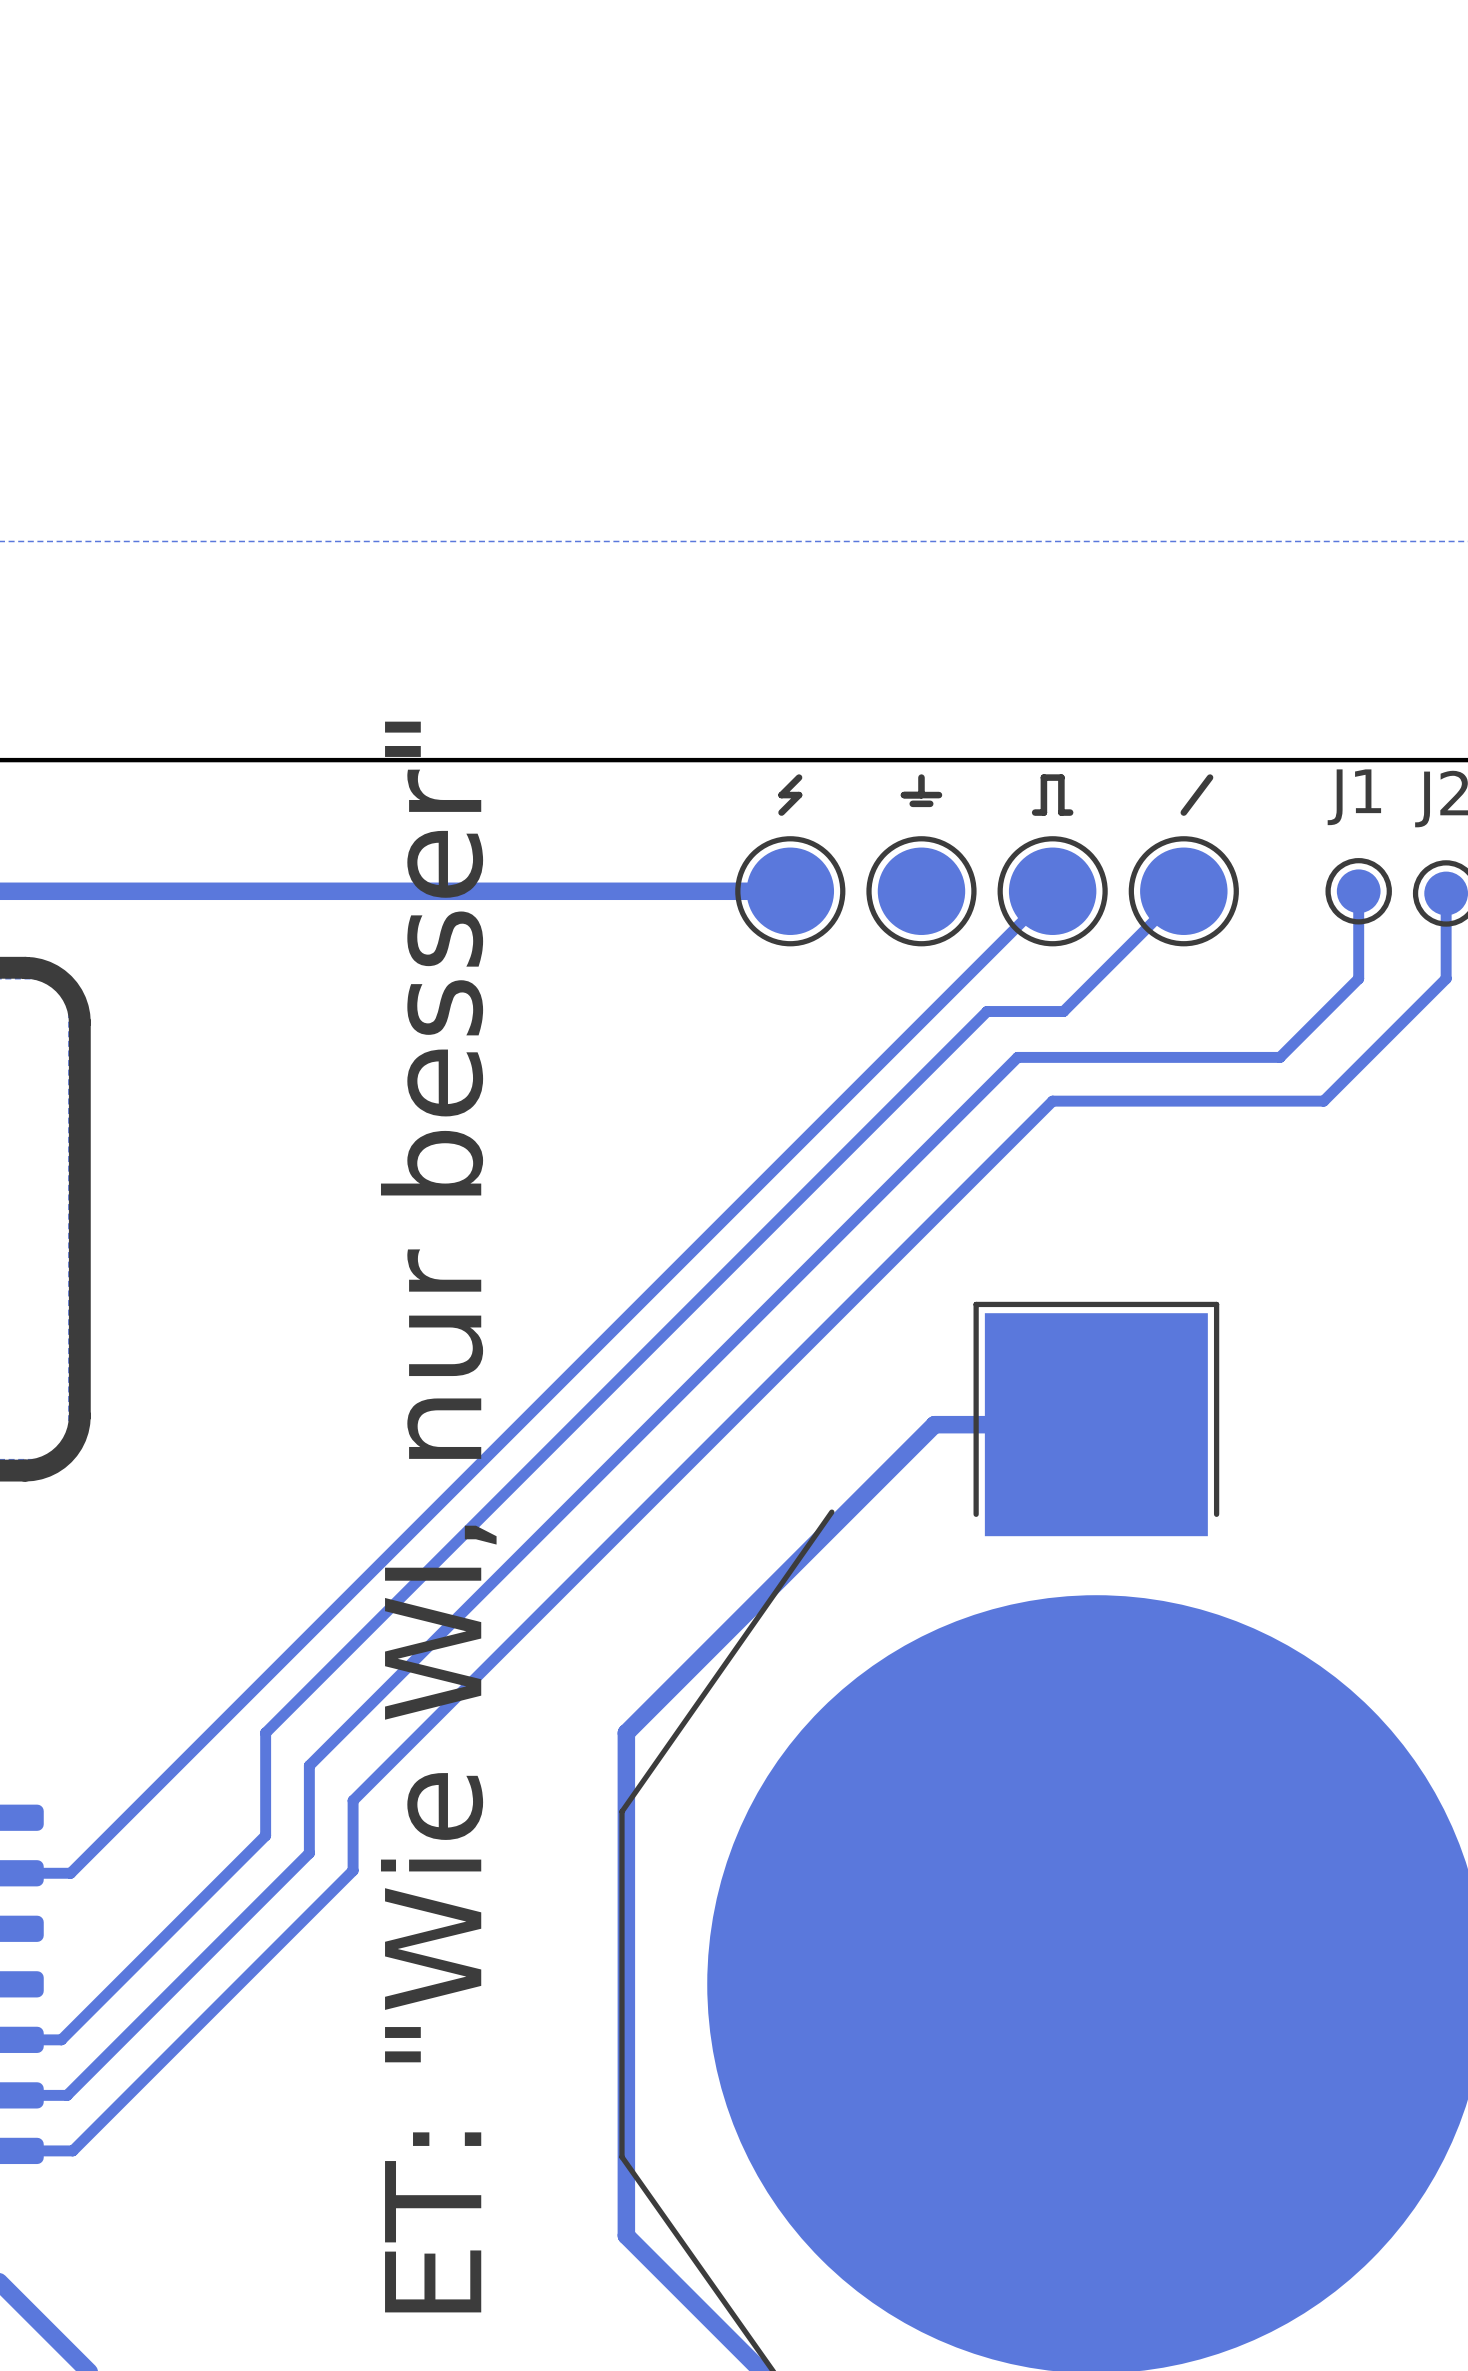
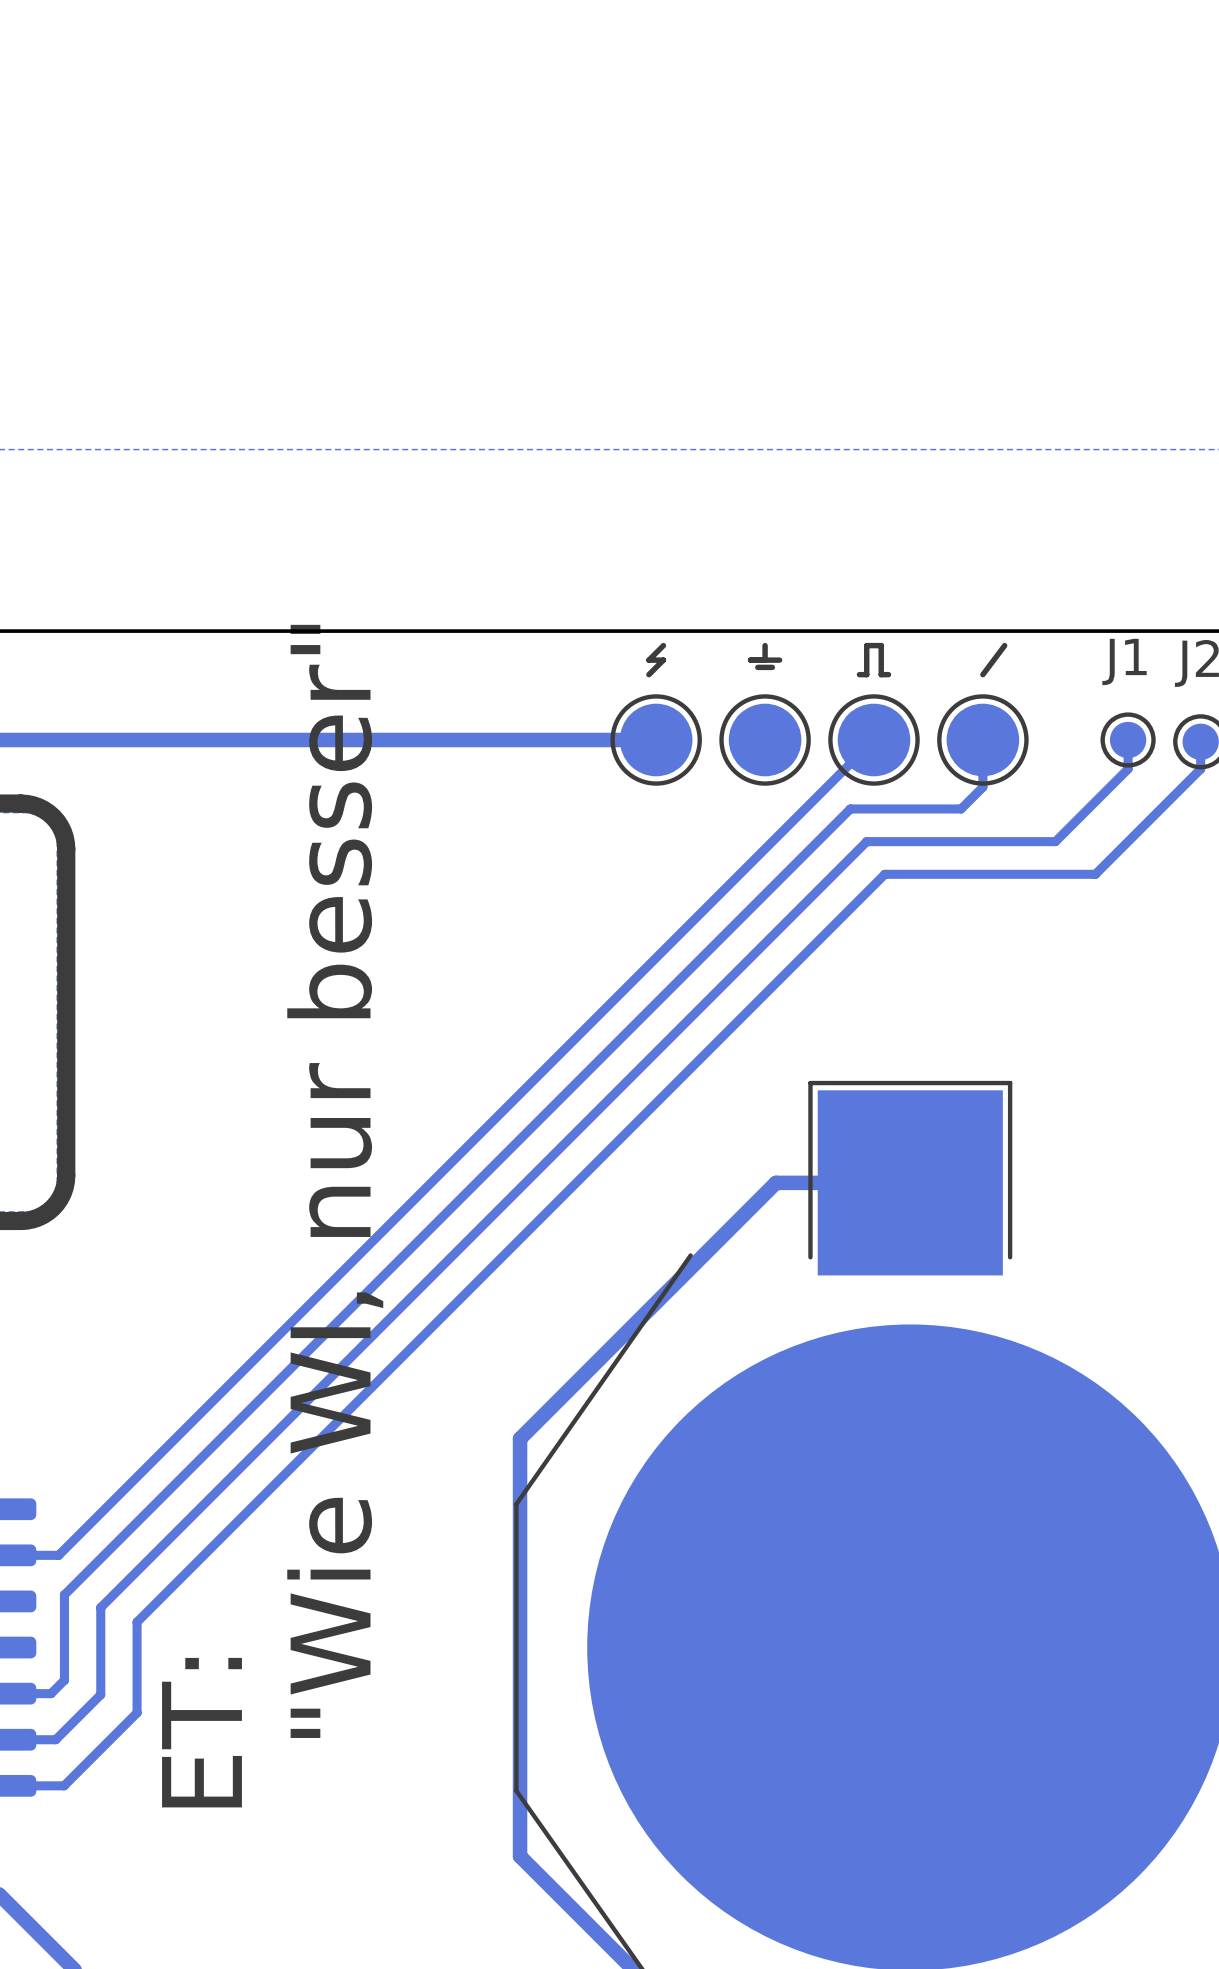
track: (1183, 891) (1063, 1011) (987, 1011) -> (982, 739) (982, 787) (961, 808) (850, 808) (819, 839)
track: (1358, 926) (1358, 978) (1280, 1057) (1017, 1057) (309, 1765) (309, 1853) (121, 2041) -> (1128, 769) (1055, 841) (866, 841) (100, 1607) (100, 1694)
track: (1446, 926) (1446, 978) (1323, 1101) (1052, 1101) (353, 1800) (353, 1870) (72, 2150) -> (1200, 769) (1095, 874) (884, 874) (137, 1622) (137, 1712) (64, 1785) (60, 1785)
text: ET: "Wie WI, nur besser" (438, 1517) -> "Wie WI, nur besser" (335, 1181)
track: (265, 1732) (265, 1835) (77, 2023) -> (220, 1438) (64, 1594) (64, 1680)
text: none -> ET: (201, 1732)

